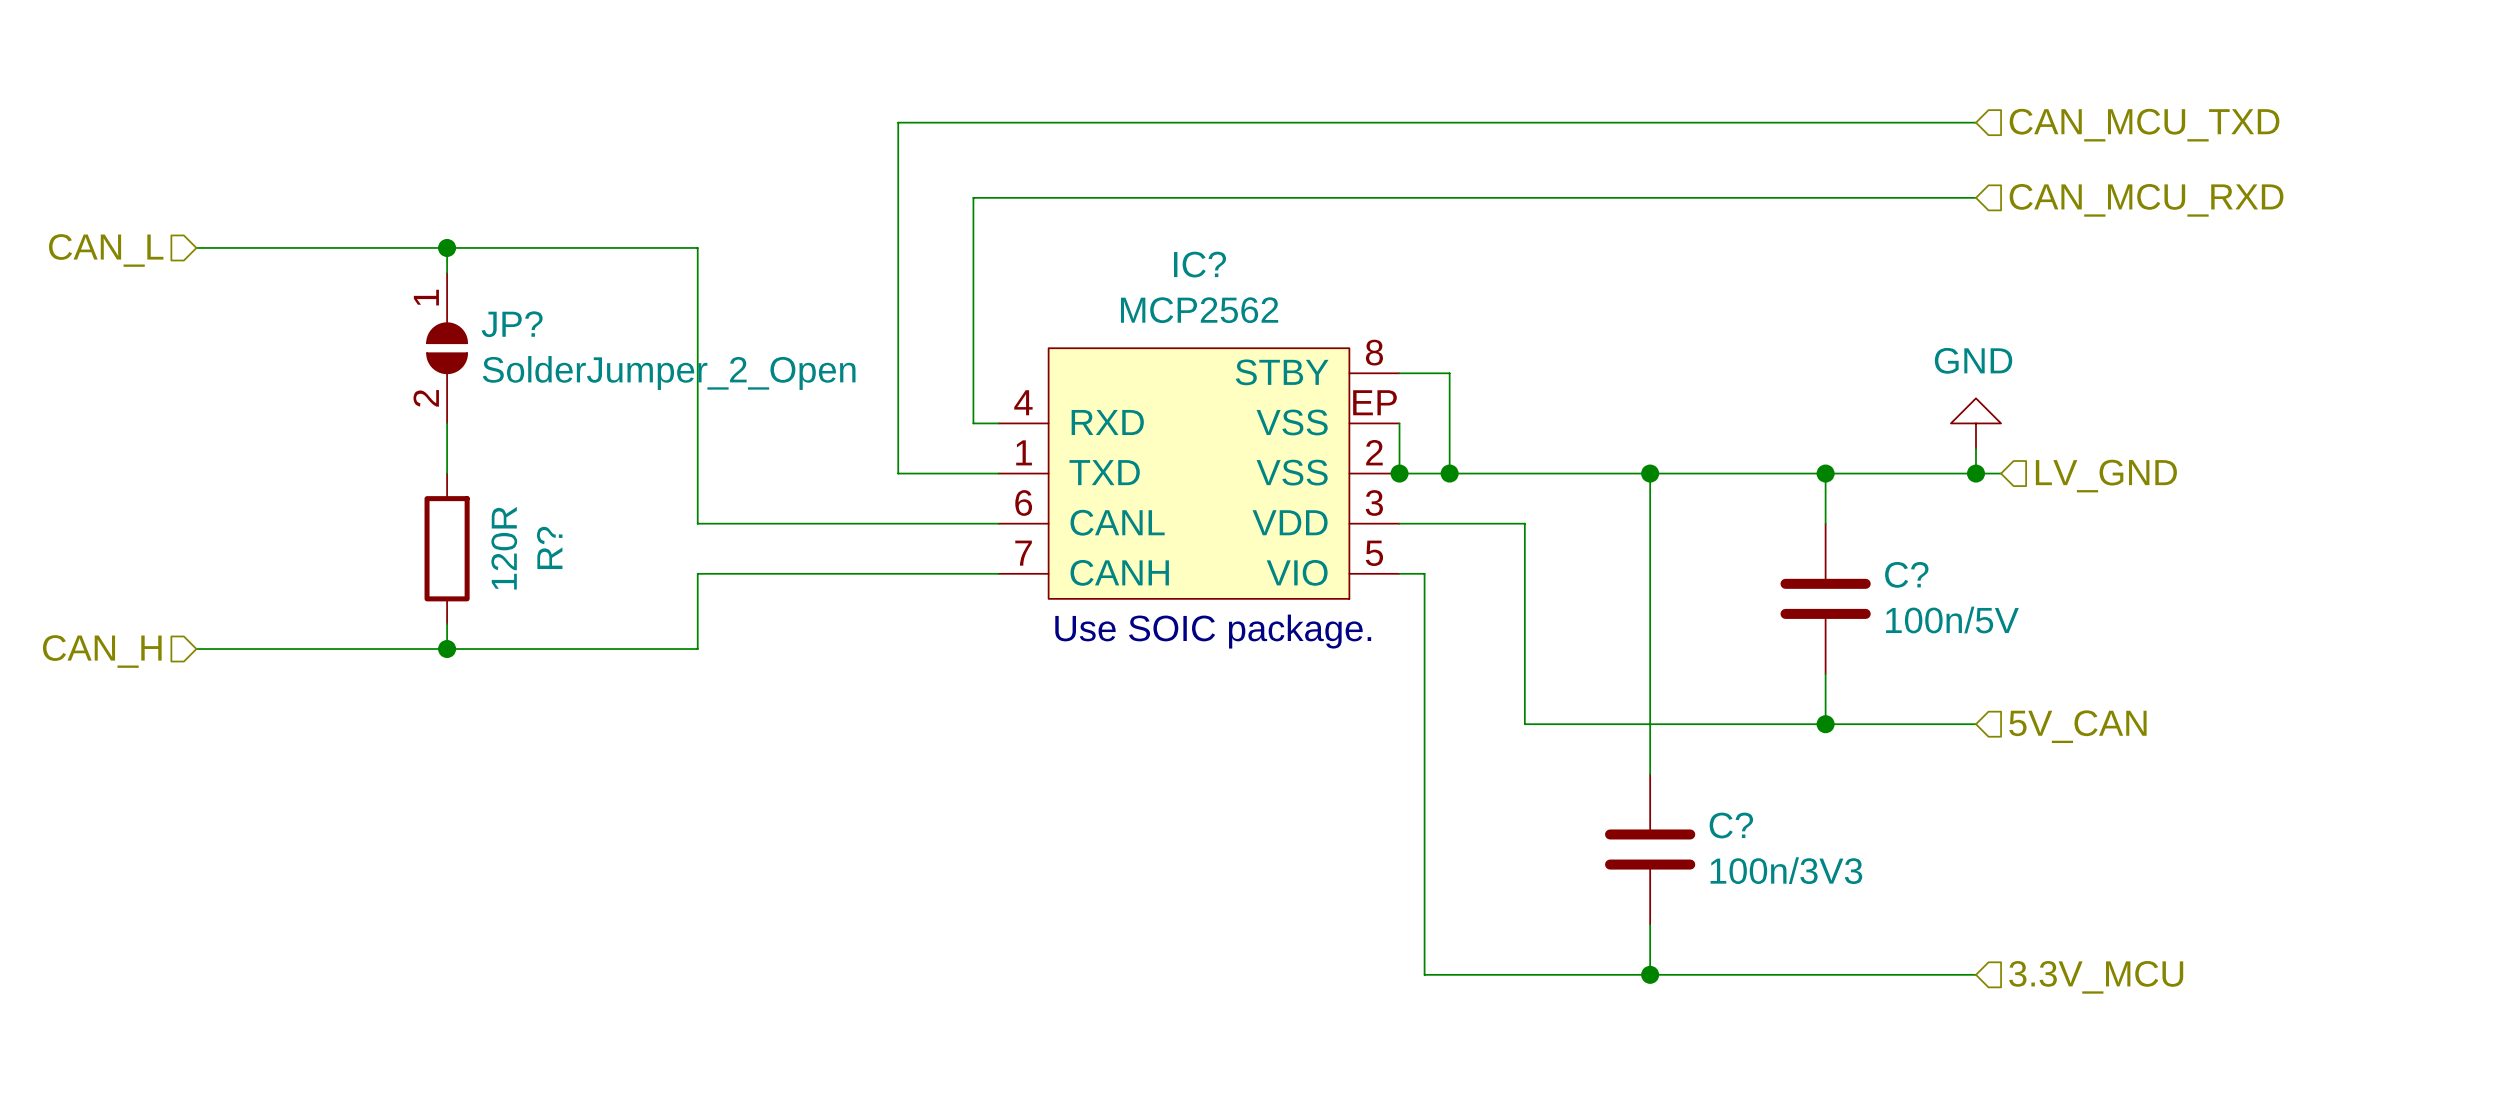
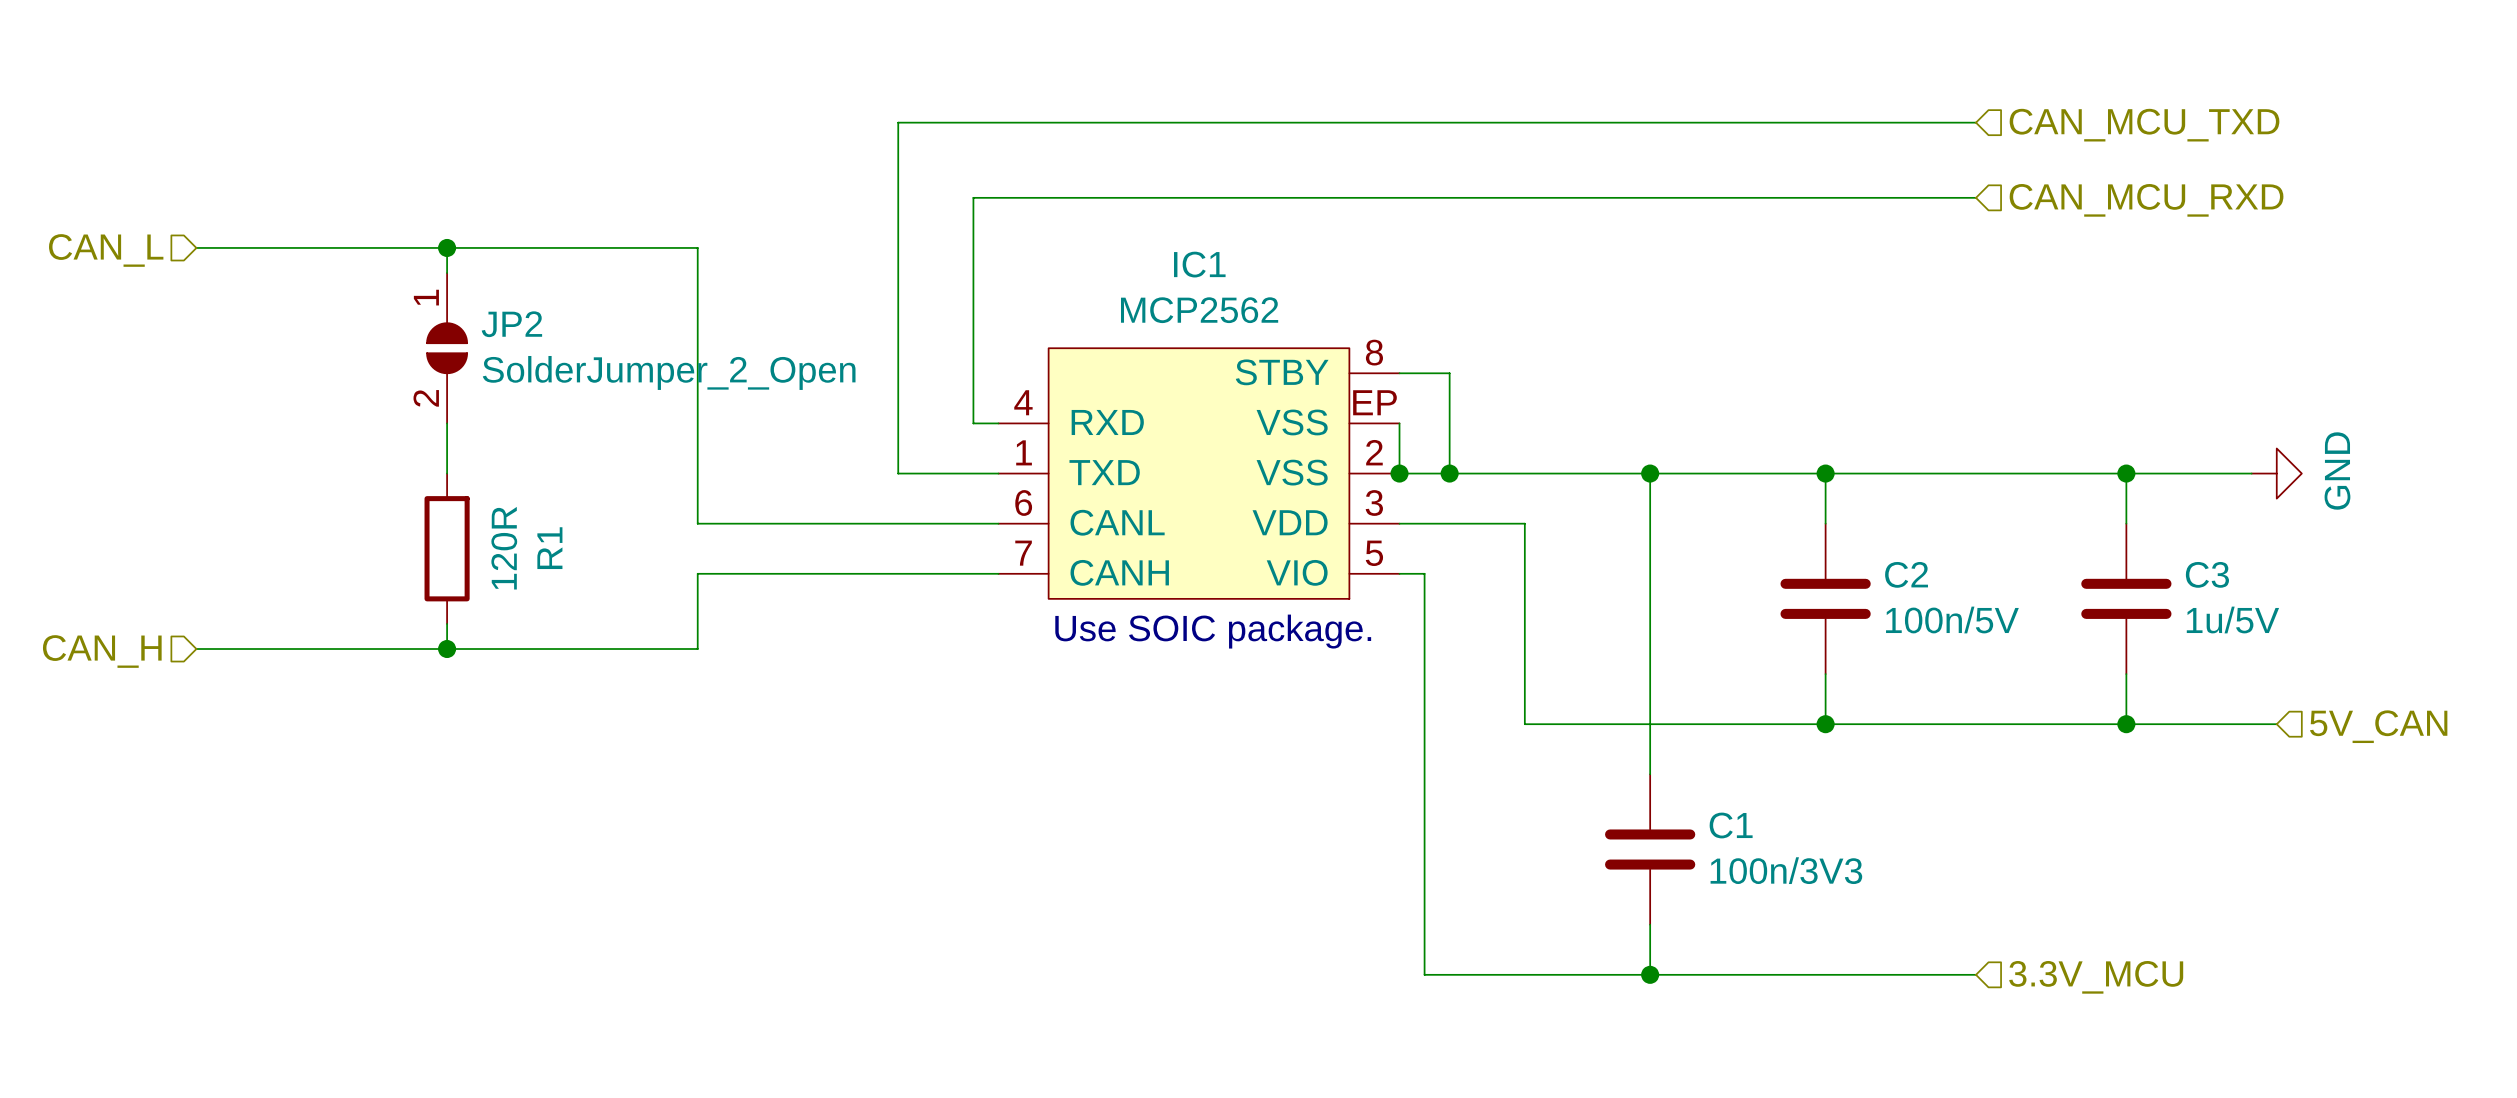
IC? name: IC? (1200, 264) -> IC1 (1199, 264)
JP? name: JP? (512, 324) -> JP2 (511, 324)
power symbol rotation: 0° (1975, 423) -> 90° clockwise (2276, 473)
power symbol position: GND (1975, 423) -> GND (2276, 473)
wire: (1975, 448) (1975, 473) -> none
junction: (1975, 473) -> none
wire: none -> (2001, 473) (2251, 473)
wire: none -> (2126, 473) (2126, 523)
junction: none -> (2126, 473)
hierarchical label: LV_GND (2106, 476) -> none
R? name: R? (549, 547) -> R1 (549, 548)
C? name: C? (1906, 574) -> C2 (1906, 574)
C3: none -> 1u/5V (2126, 598)
wire: none -> (2126, 674) (2126, 724)
wire: none -> (1975, 724) (2276, 724)
junction: none -> (2126, 724)
hierarchical label position: 5V_CAN (2077, 726) -> 5V_CAN (2378, 726)
C? name: C? (1731, 825) -> C1 (1731, 825)

